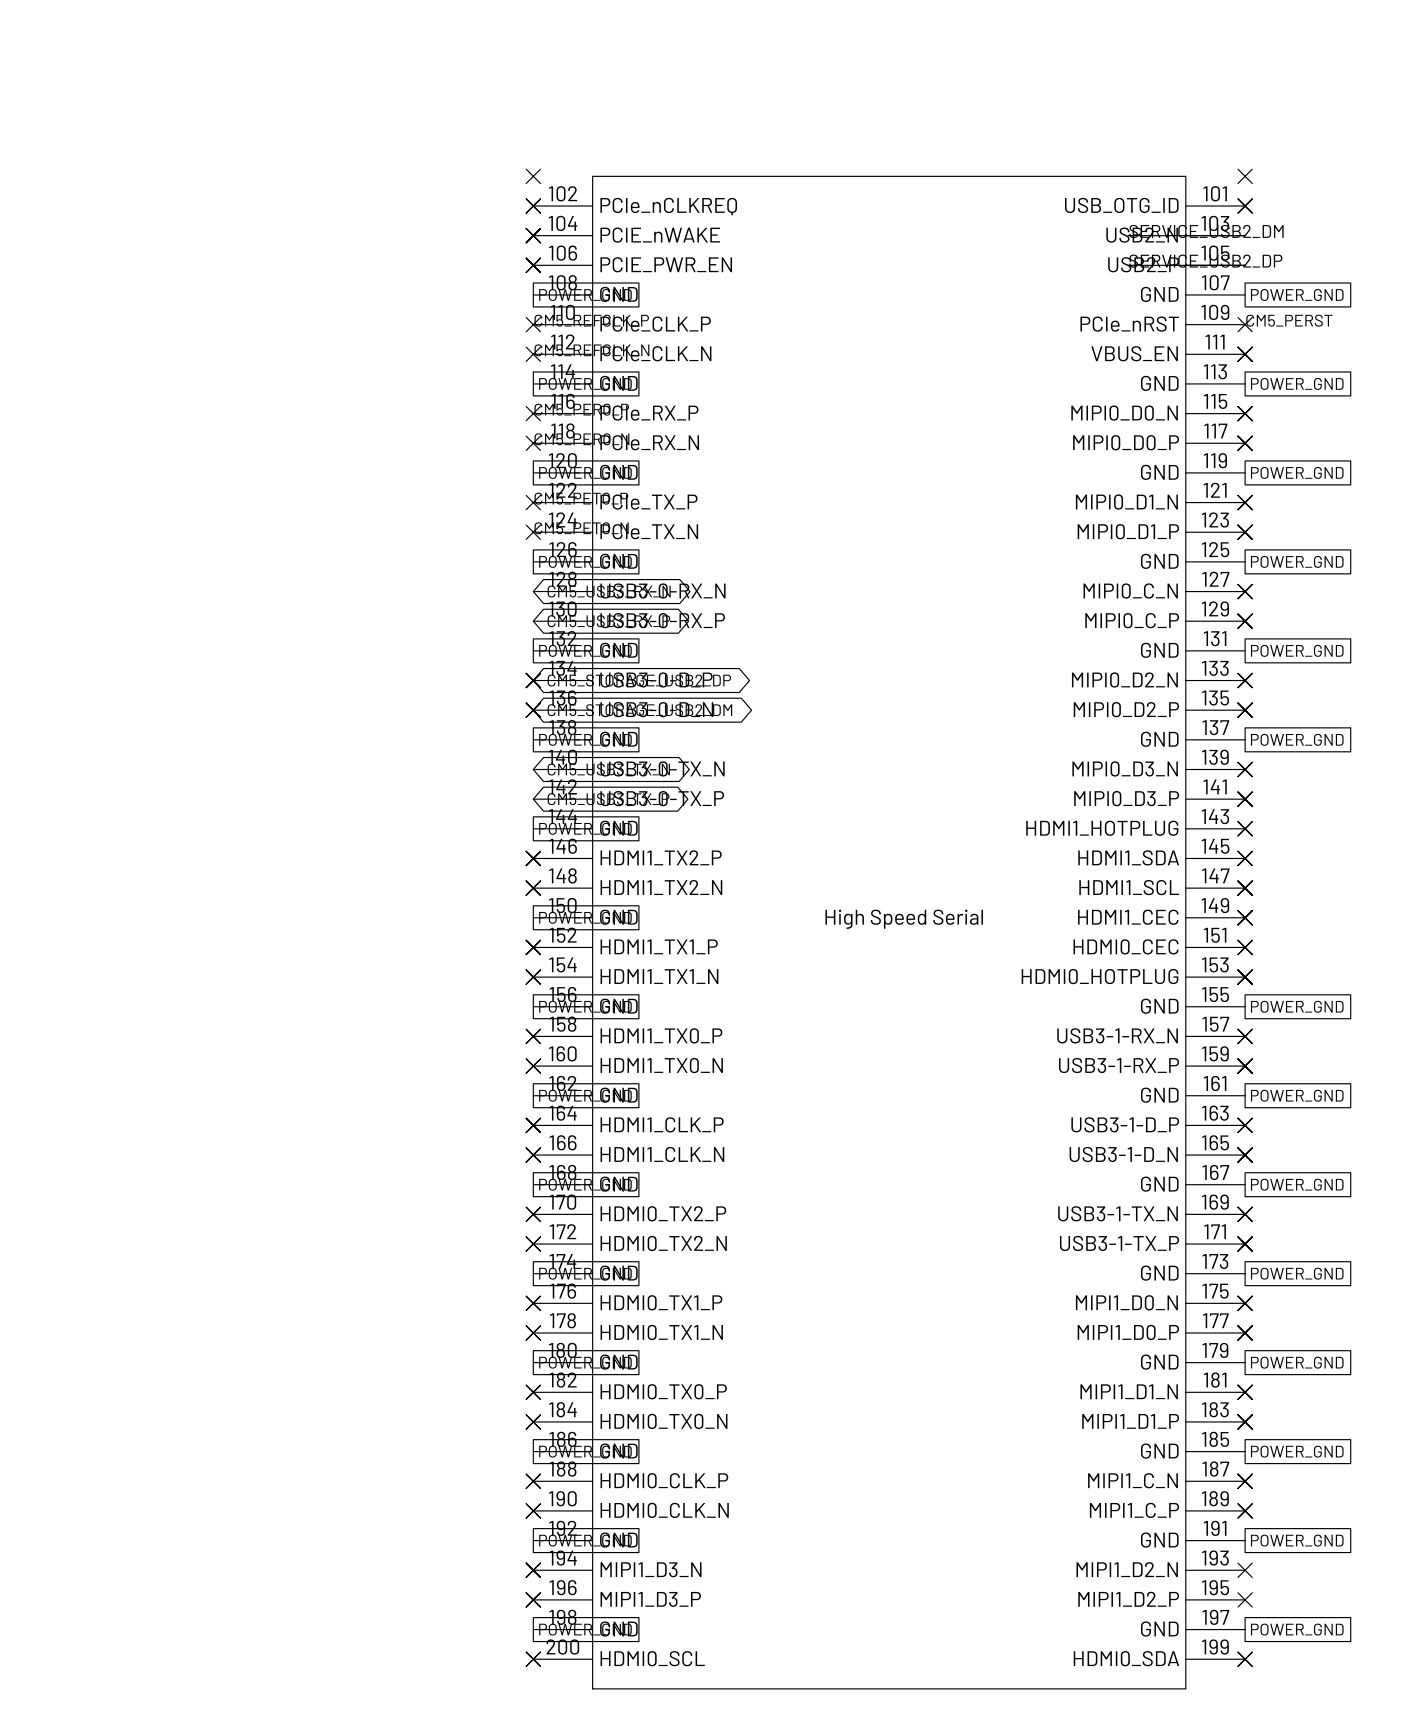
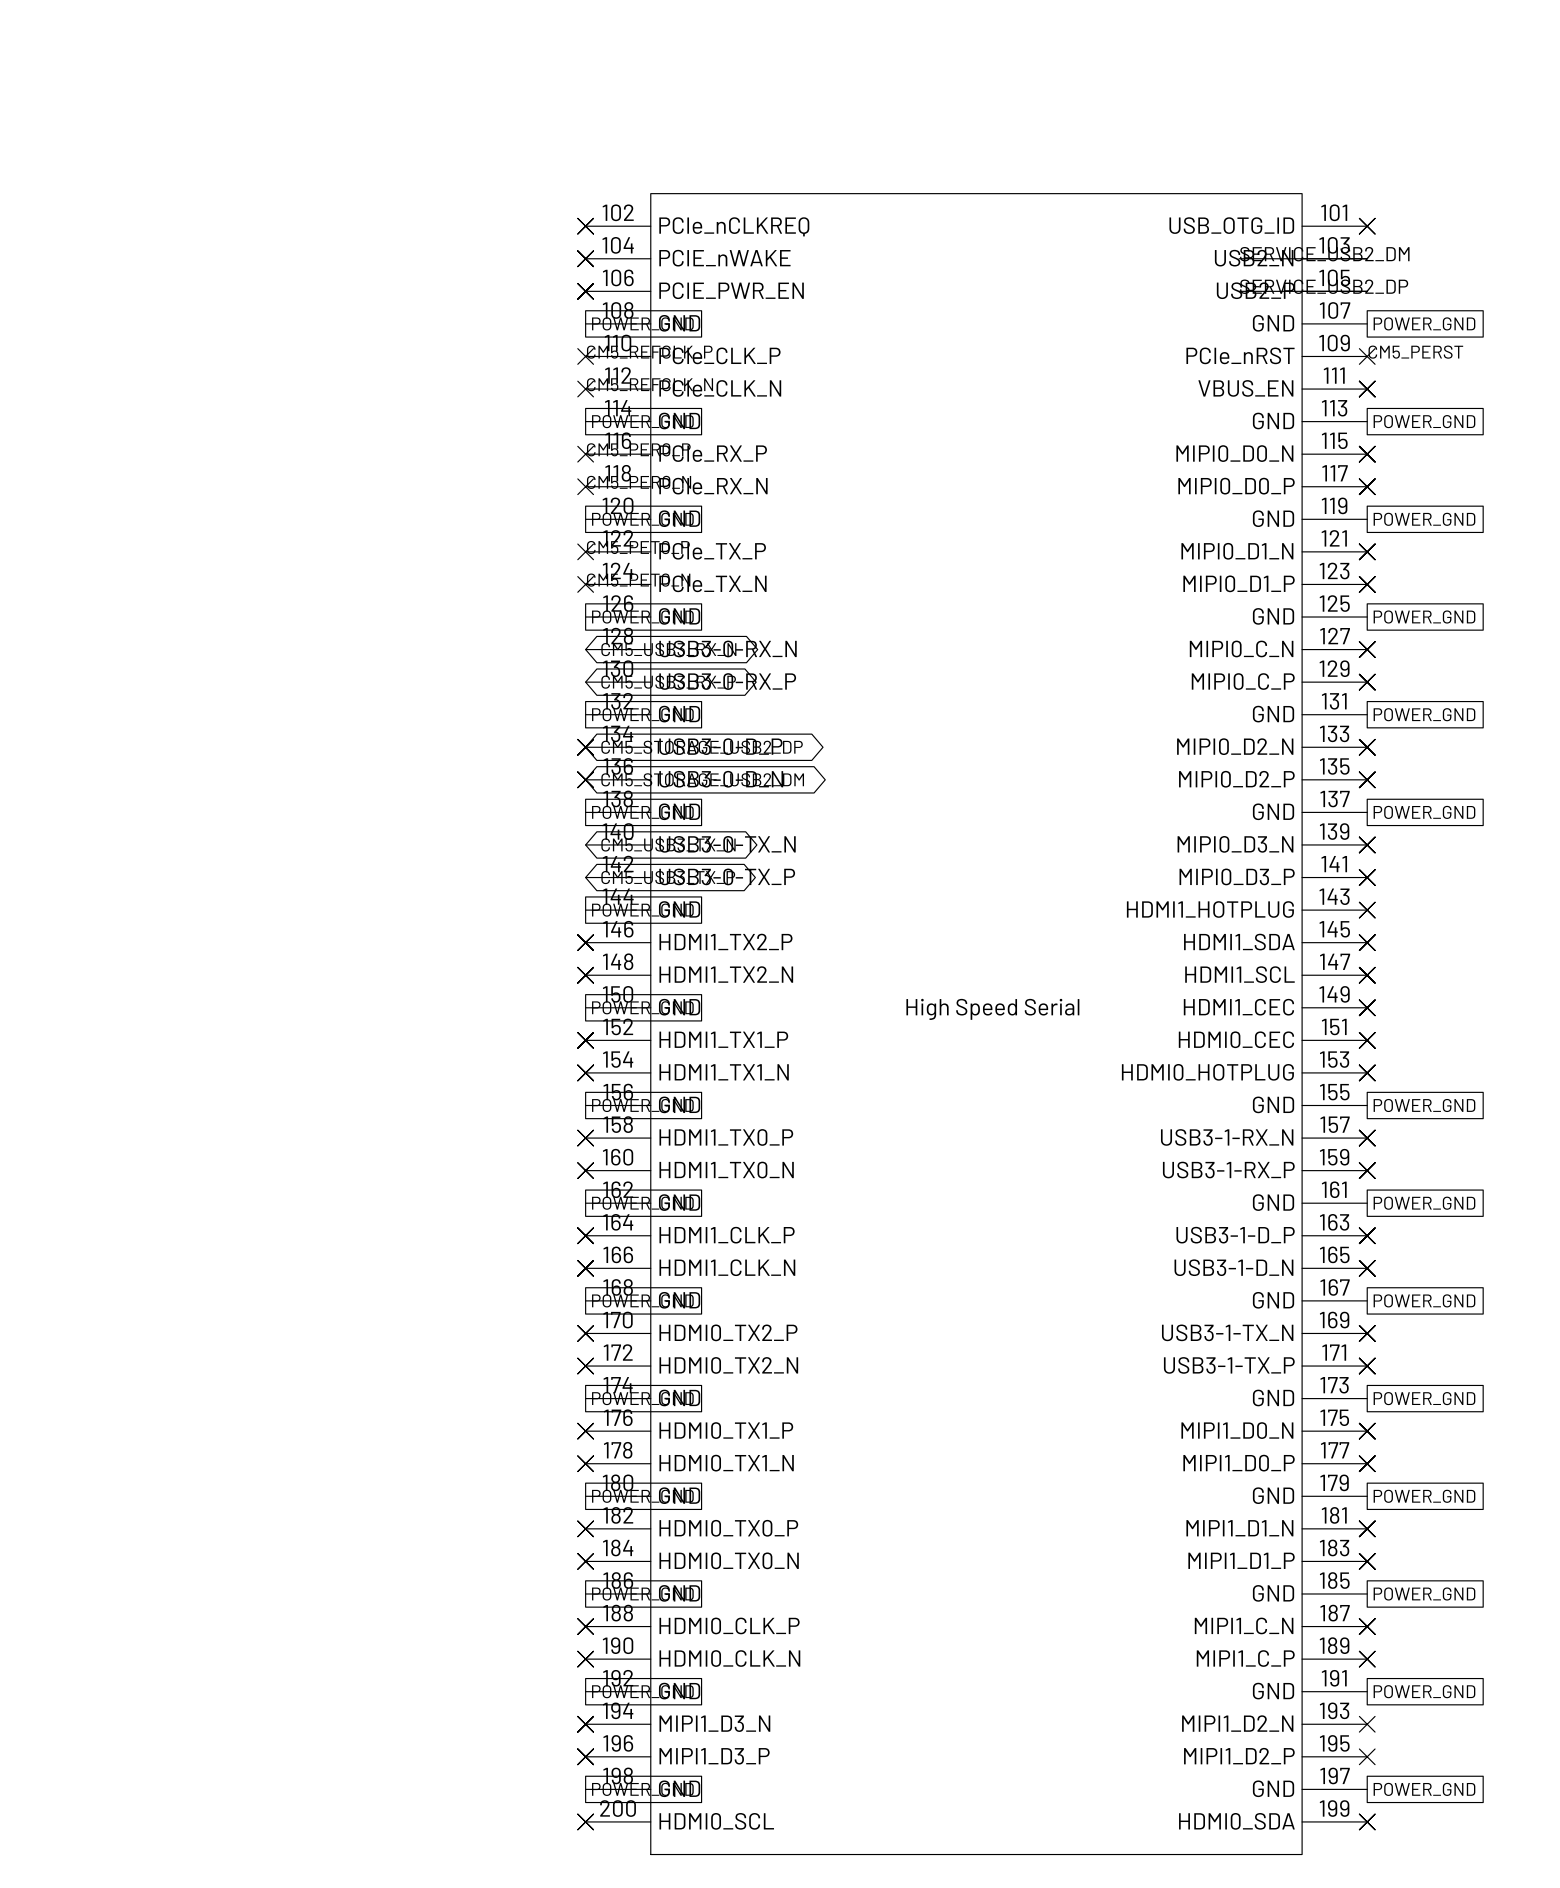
no-connect mark: (533, 176) -> none
no-connect mark: (1245, 176) -> none

